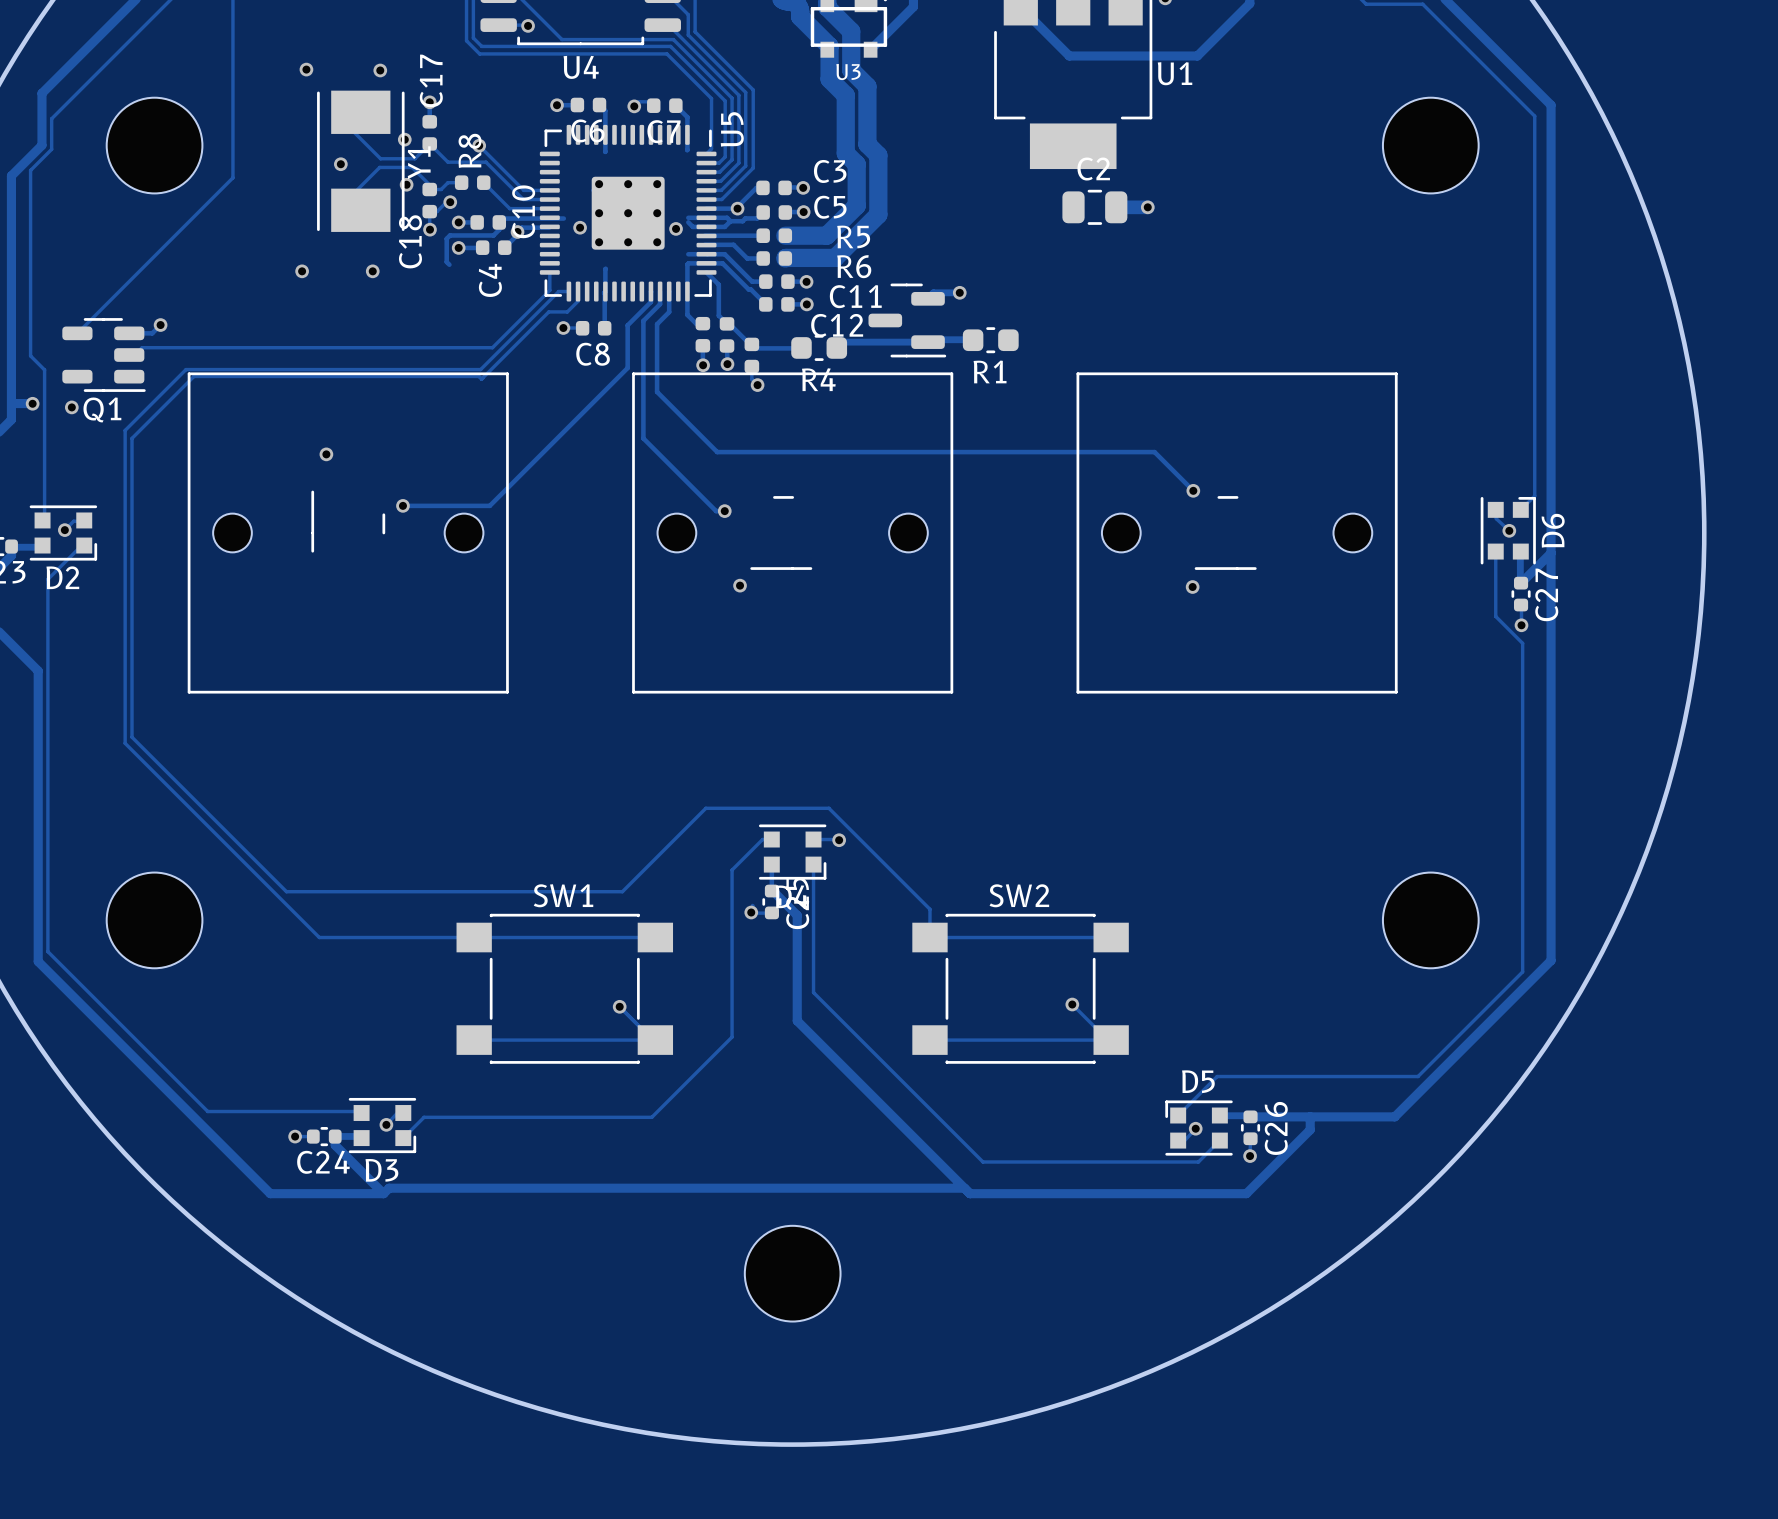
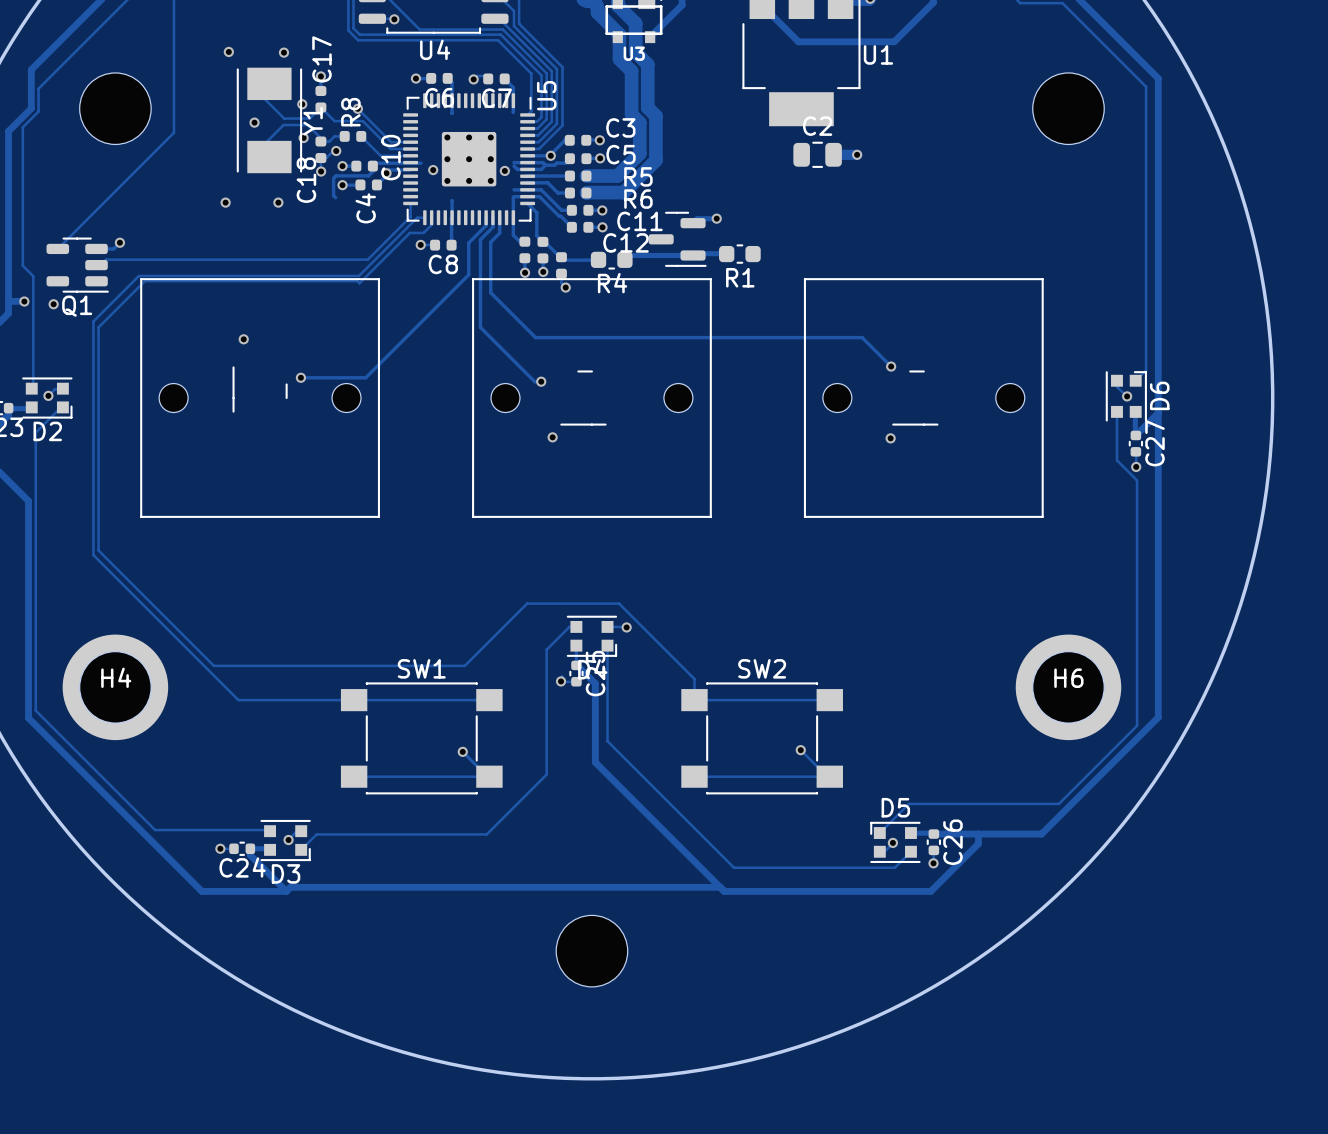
part: (154, 920) -> none
H4: none -> (115, 687)
part: (1430, 920) -> none
H6: none -> (1068, 687)

